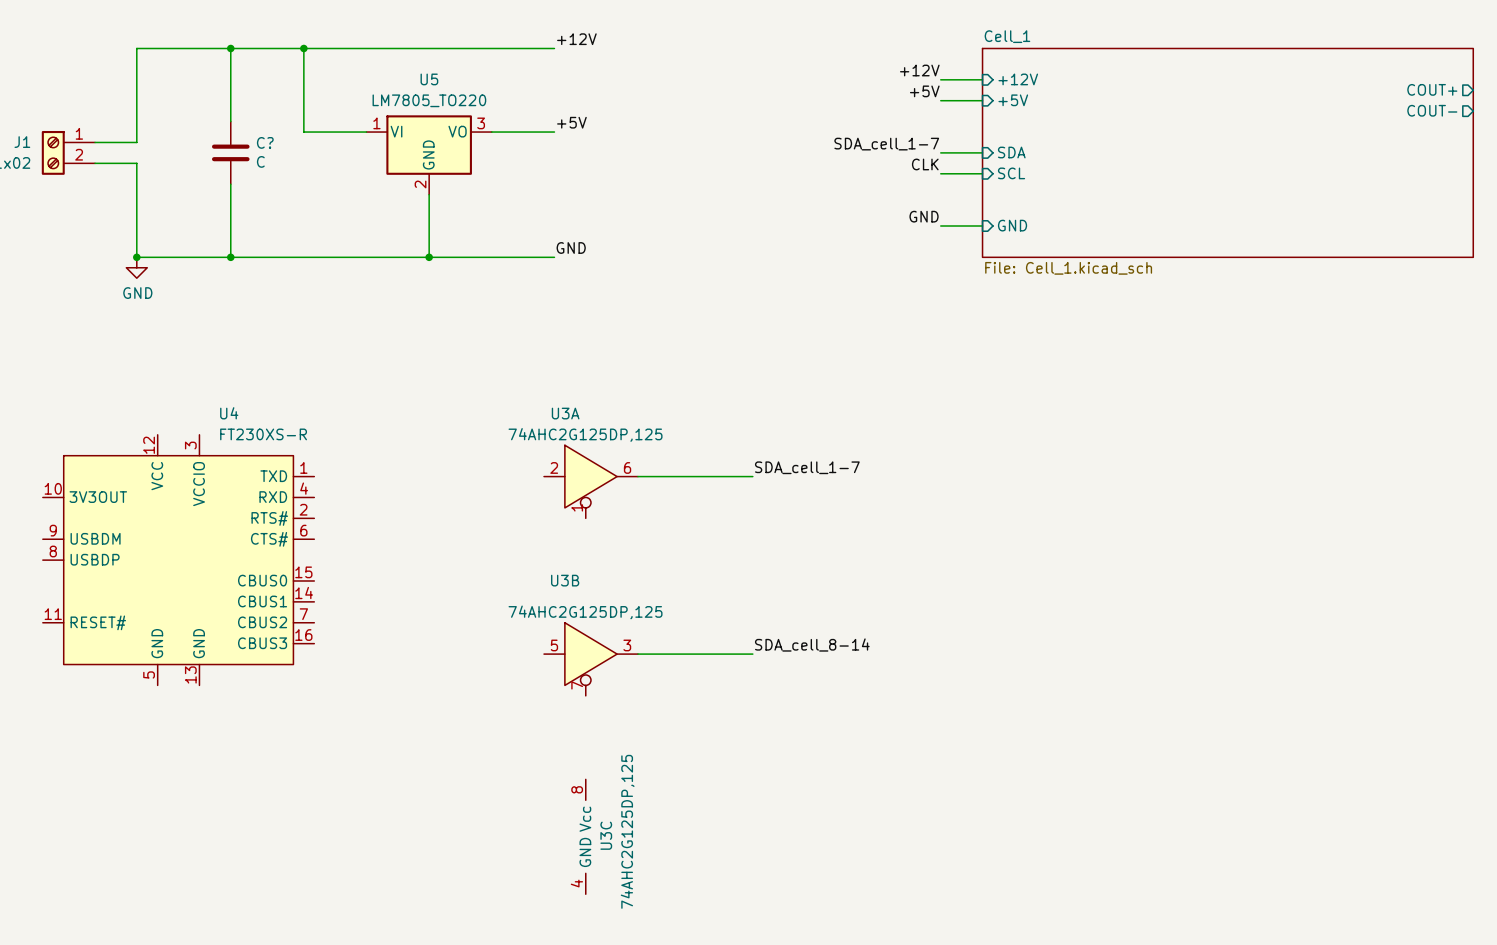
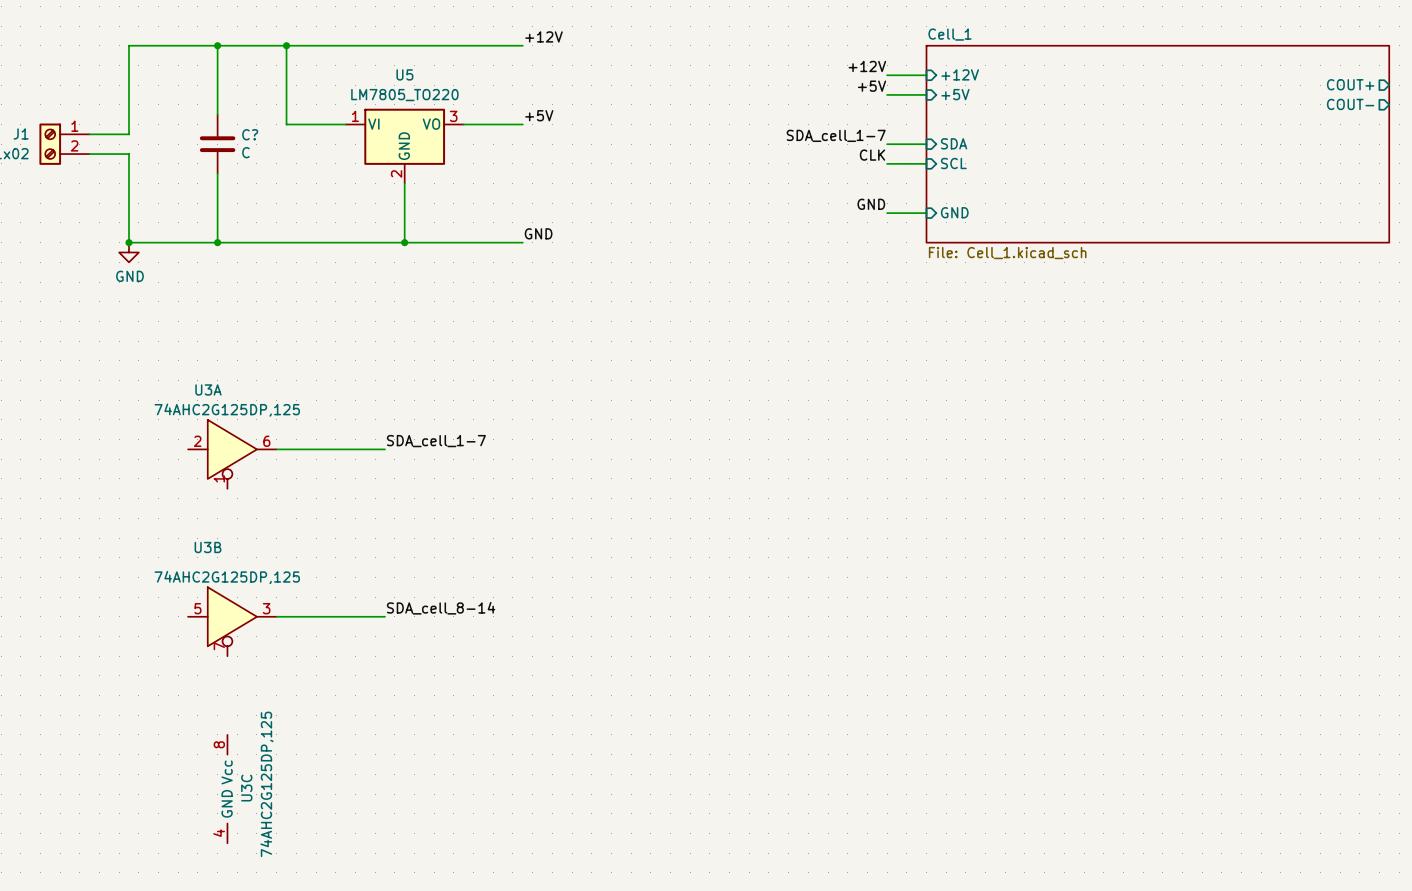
label: none -> SDA_cell_1-7 (436, 441)
label: SDA_cell_1-7 (807, 467) -> none
wire: none -> (276, 449) (384, 449)
wire: (637, 476) (752, 476) -> none
U3A position: (590, 481) -> (232, 454)
U4: FT230XS-R (178, 560) -> none
label: none -> SDA_cell_8-14 (441, 608)
label: SDA_cell_8-14 (812, 645) -> none
wire: none -> (276, 616) (384, 616)
wire: (637, 654) (752, 654) -> none
U3B position: (590, 659) -> (232, 621)
U3C position: (585, 836) -> (227, 789)

